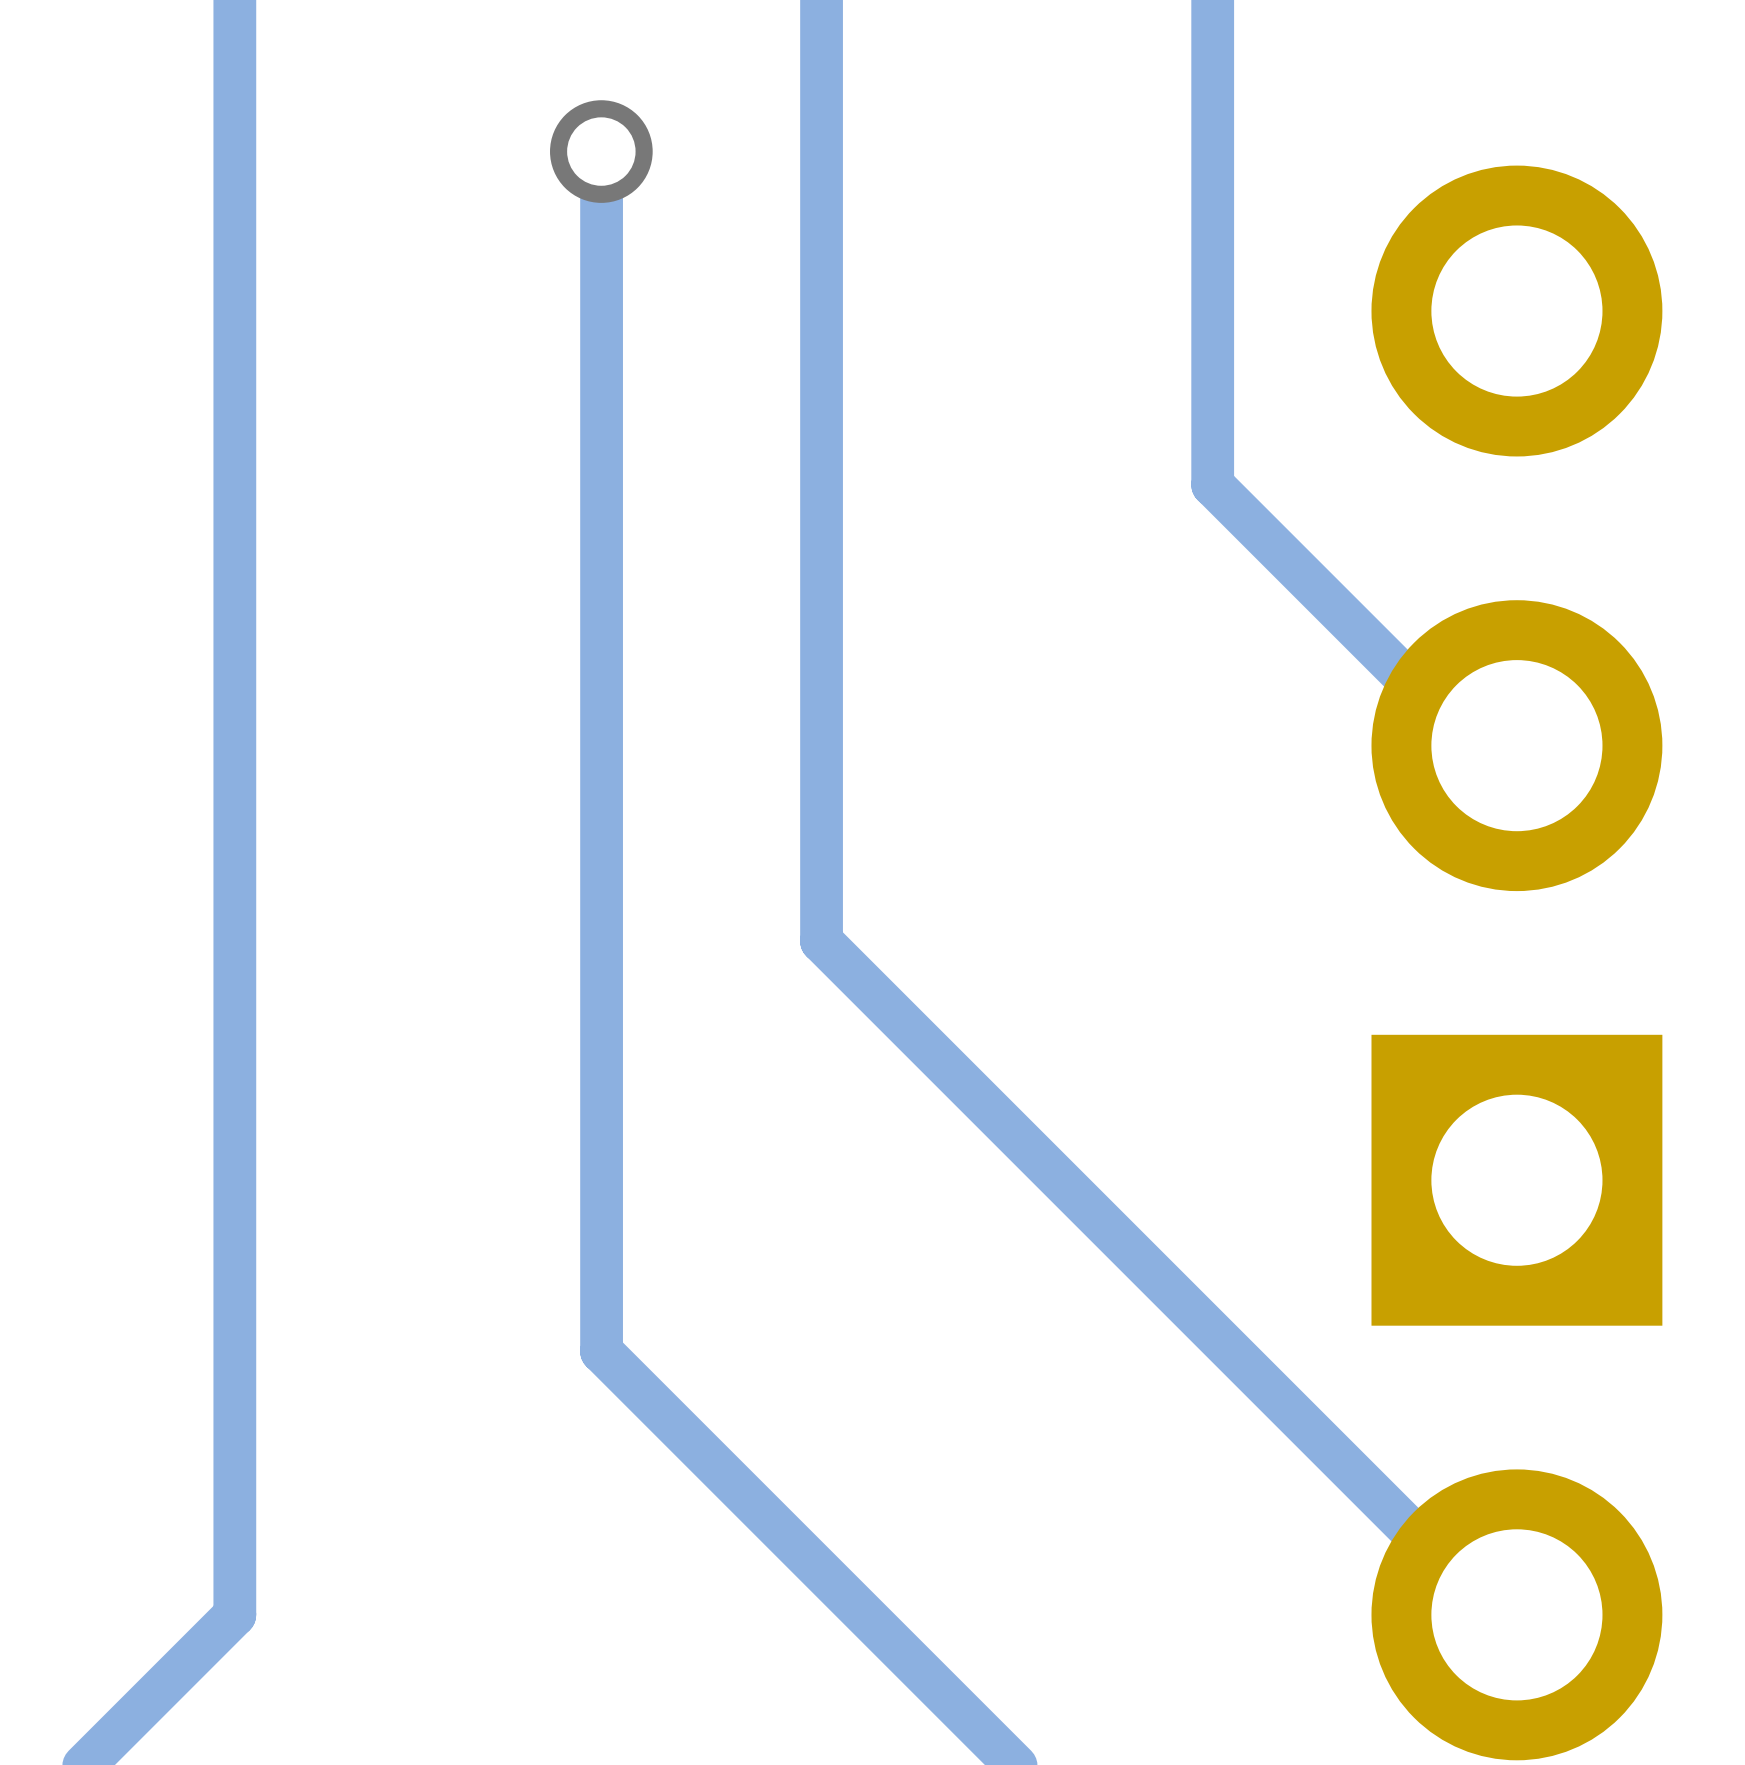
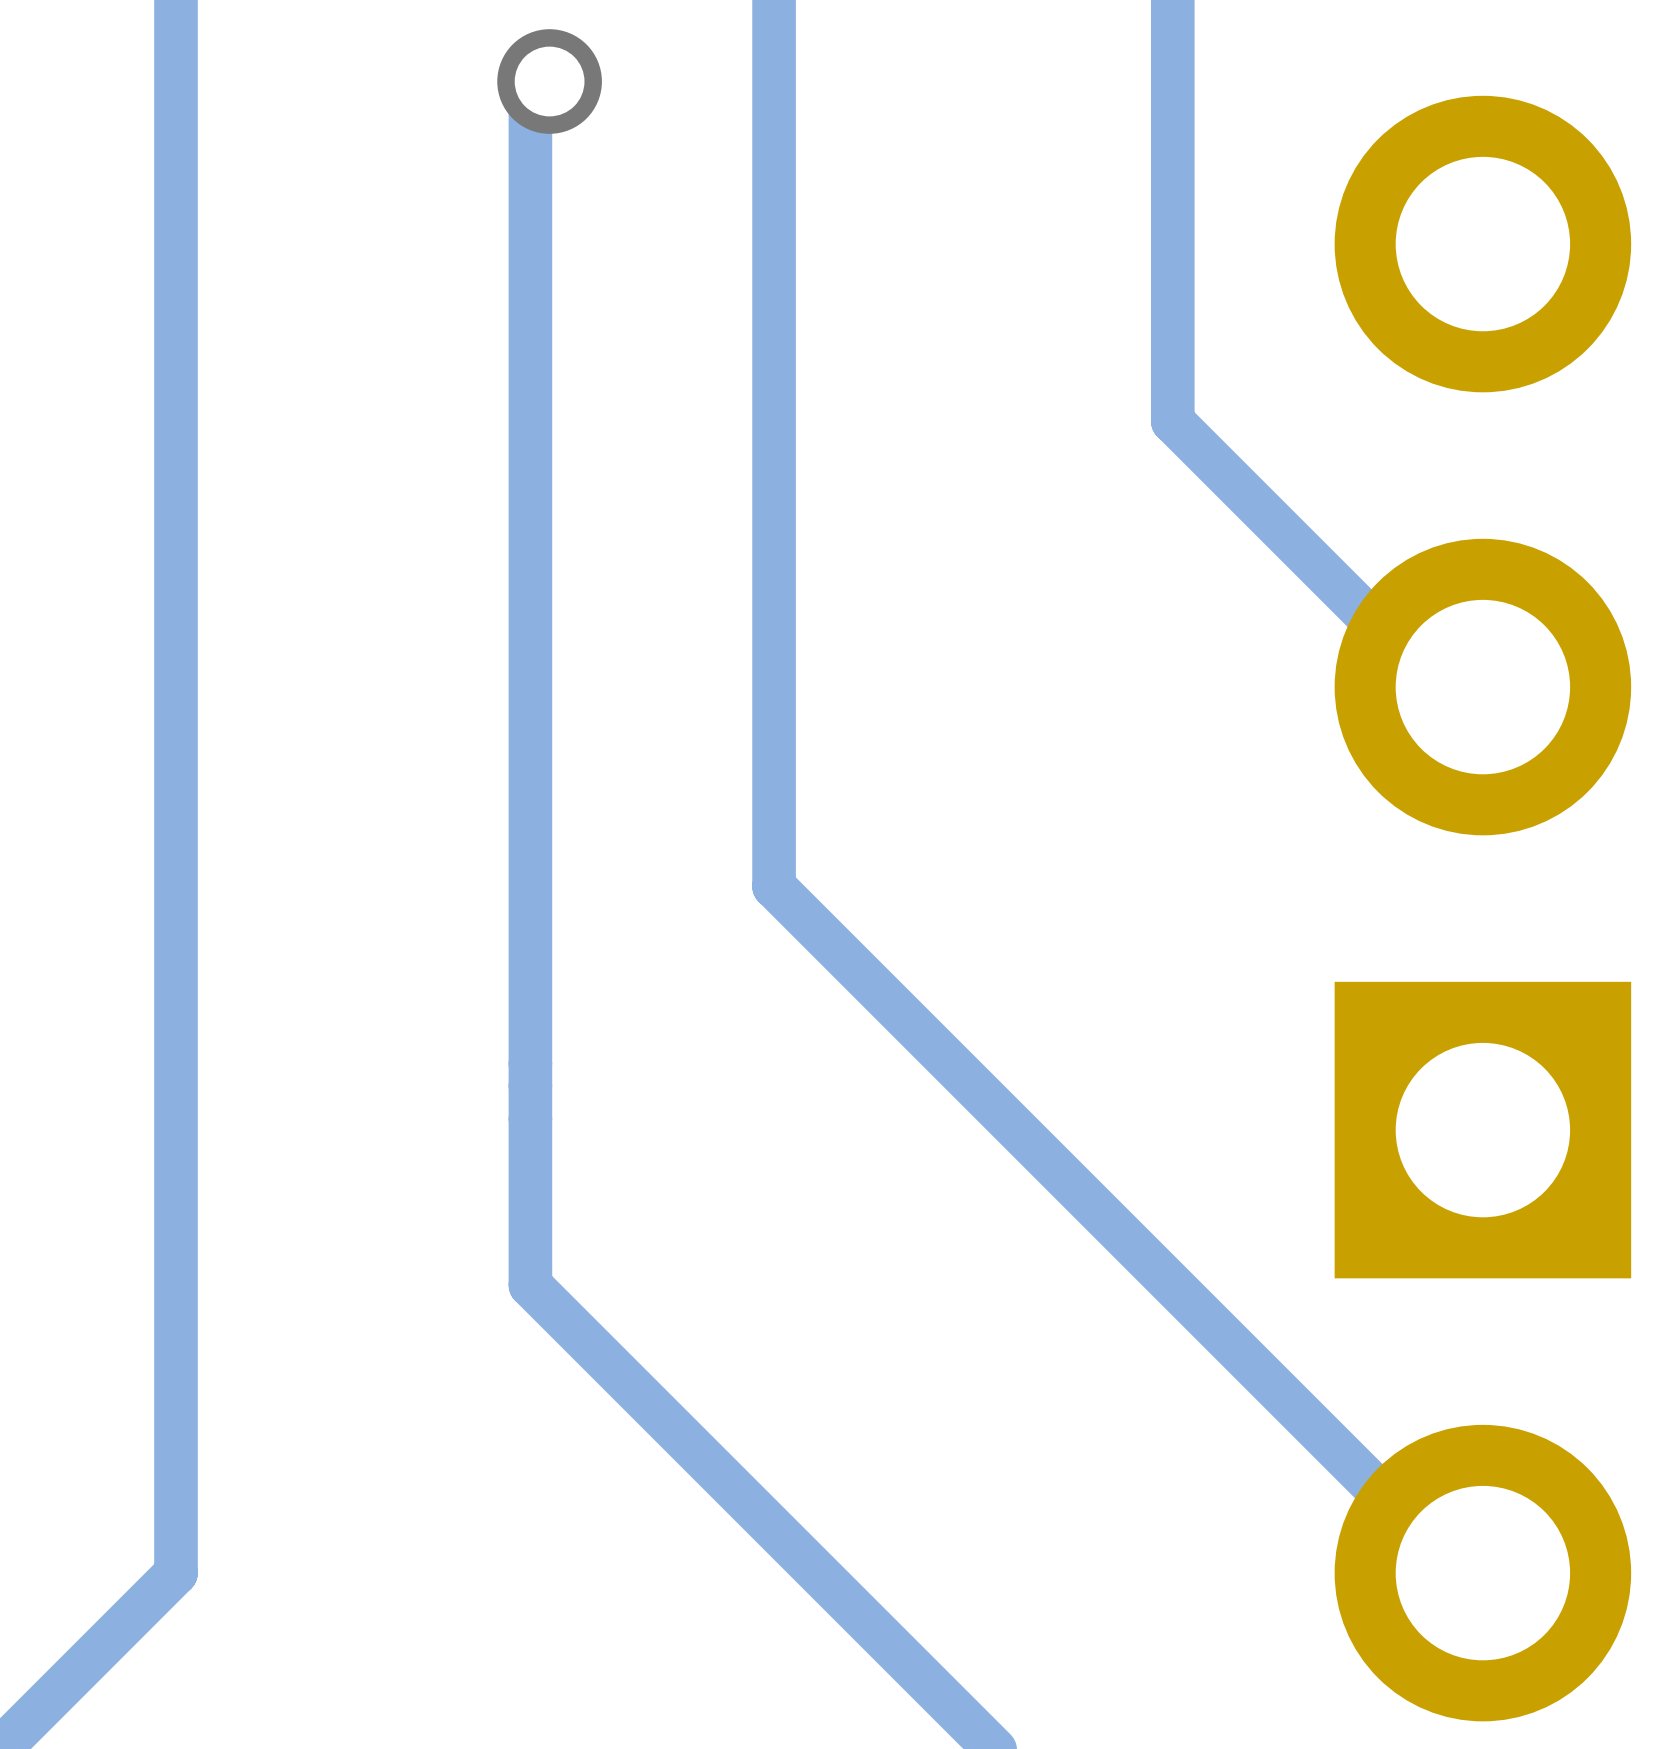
track: (601, 151) (601, 1351) -> (549, 81) (530, 100) (530, 1285) (549, 1304)

